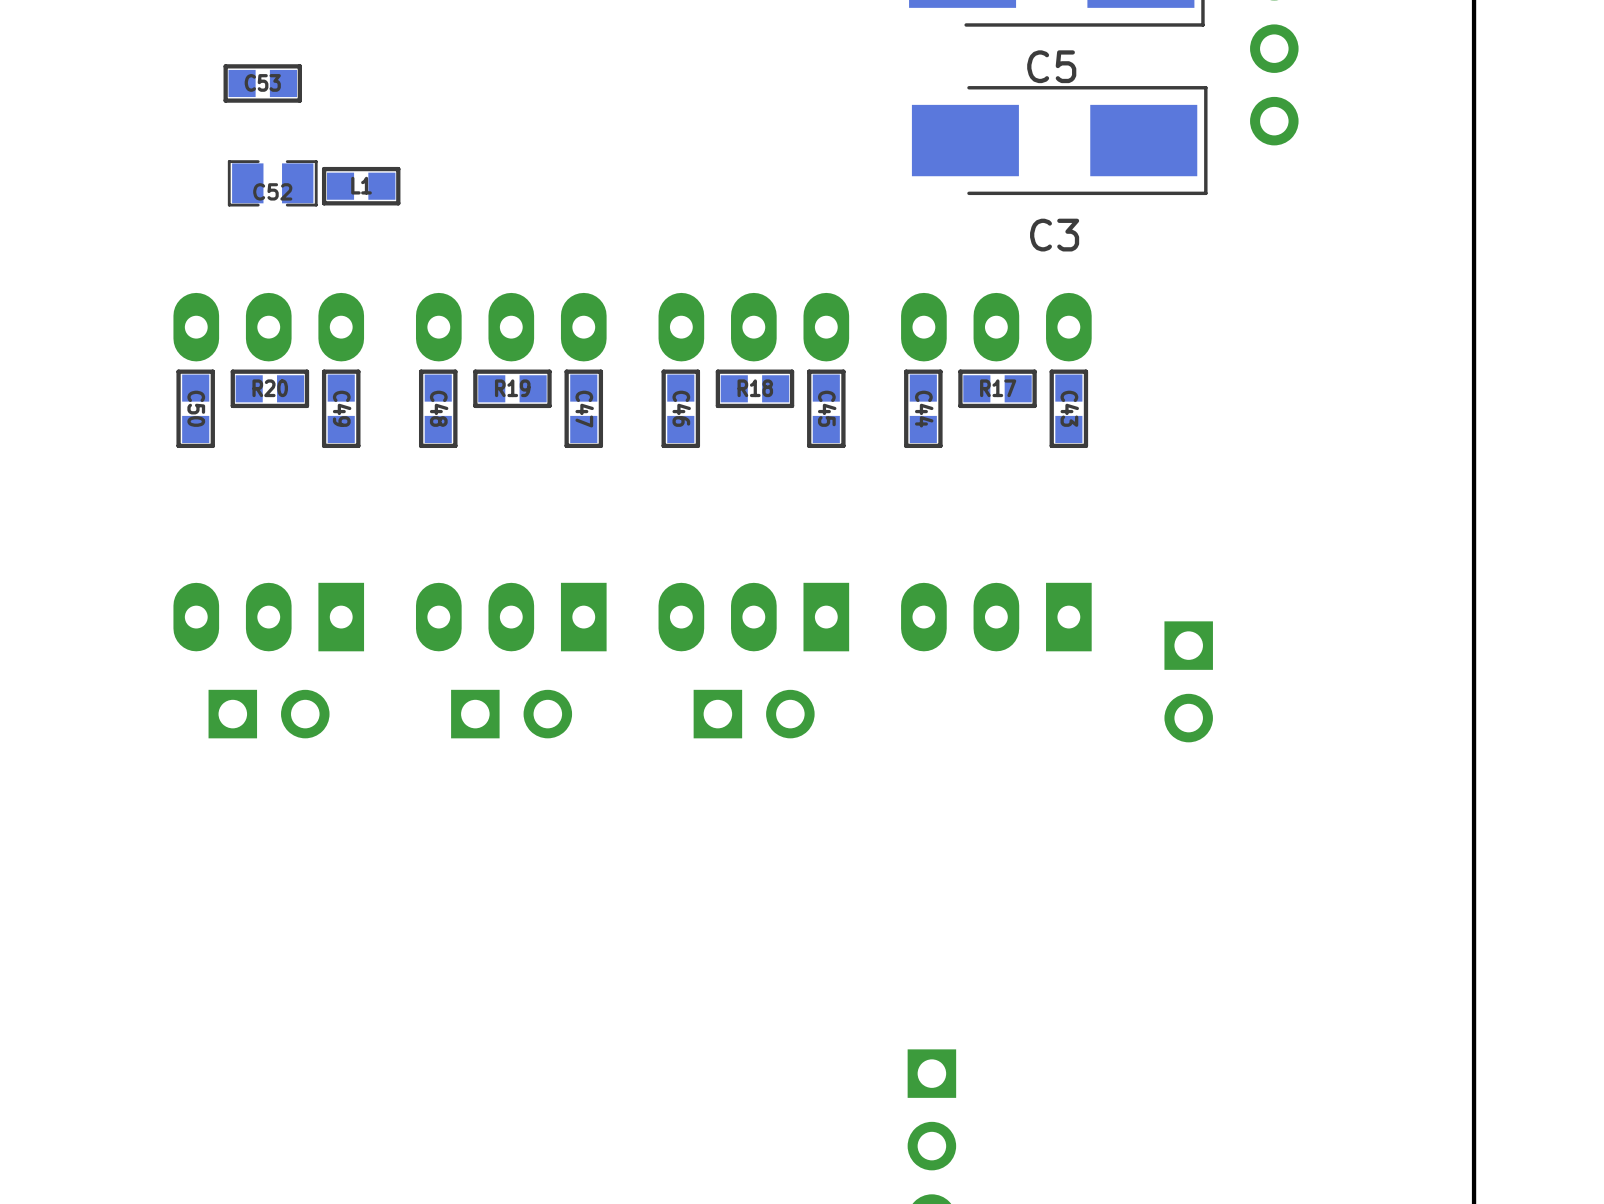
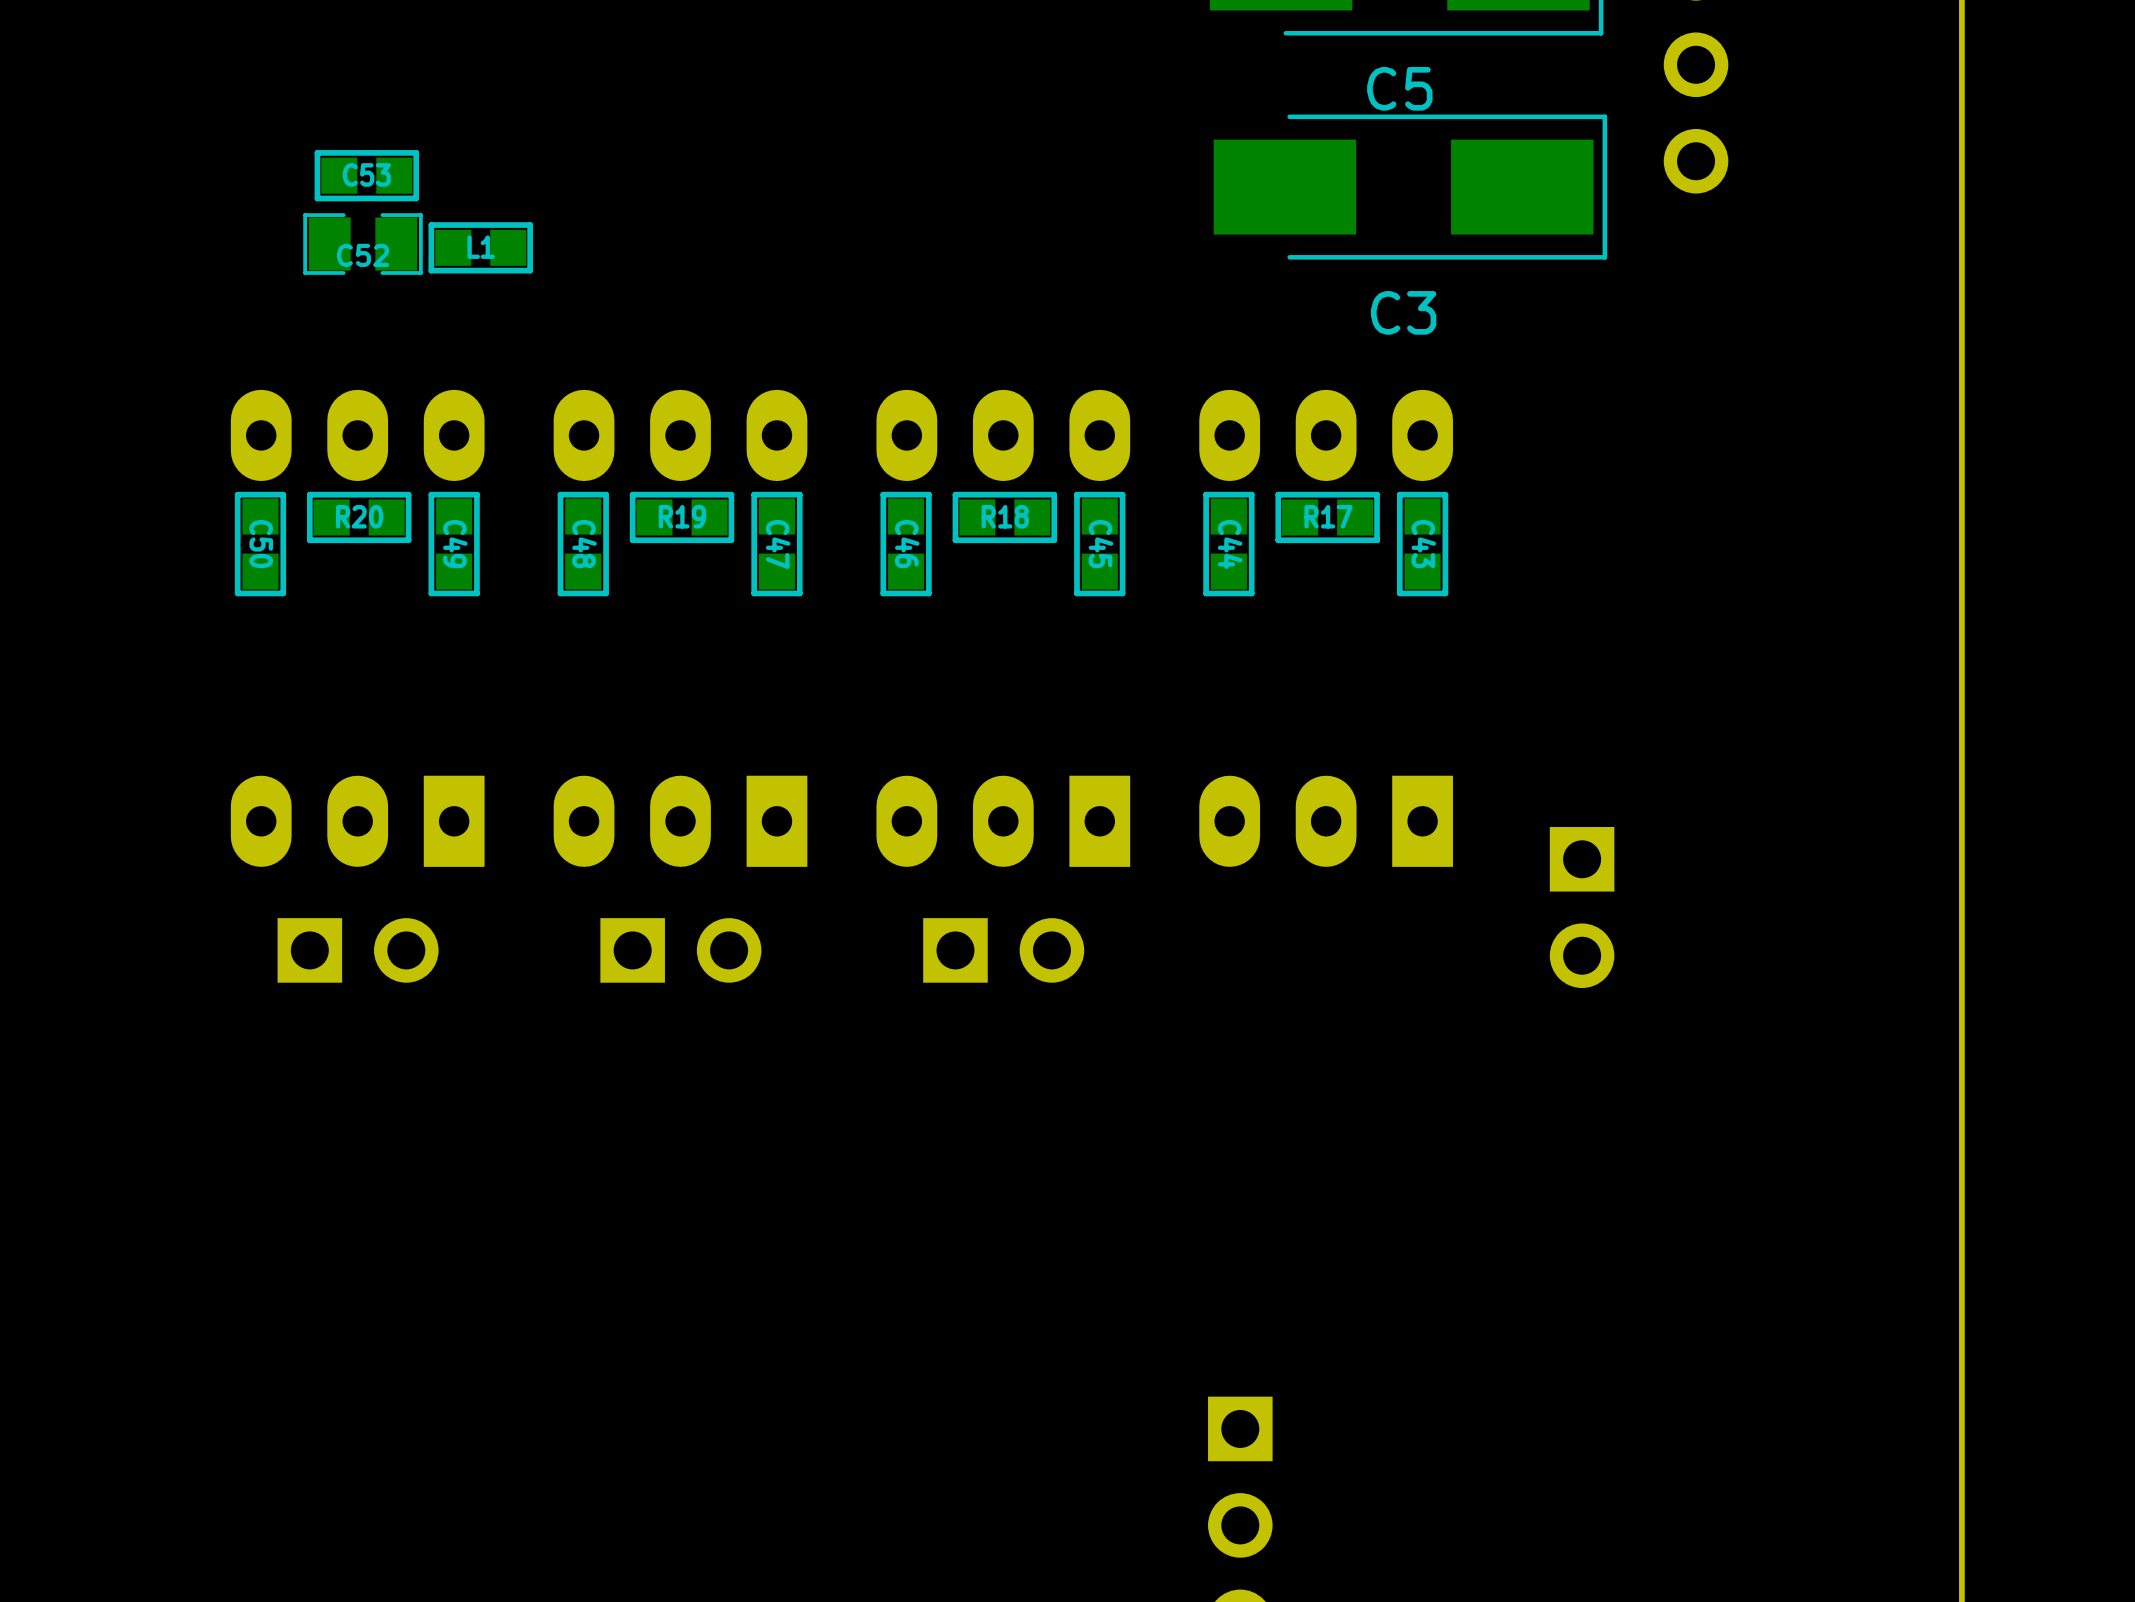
C53 position: (262, 83) -> (366, 175)

